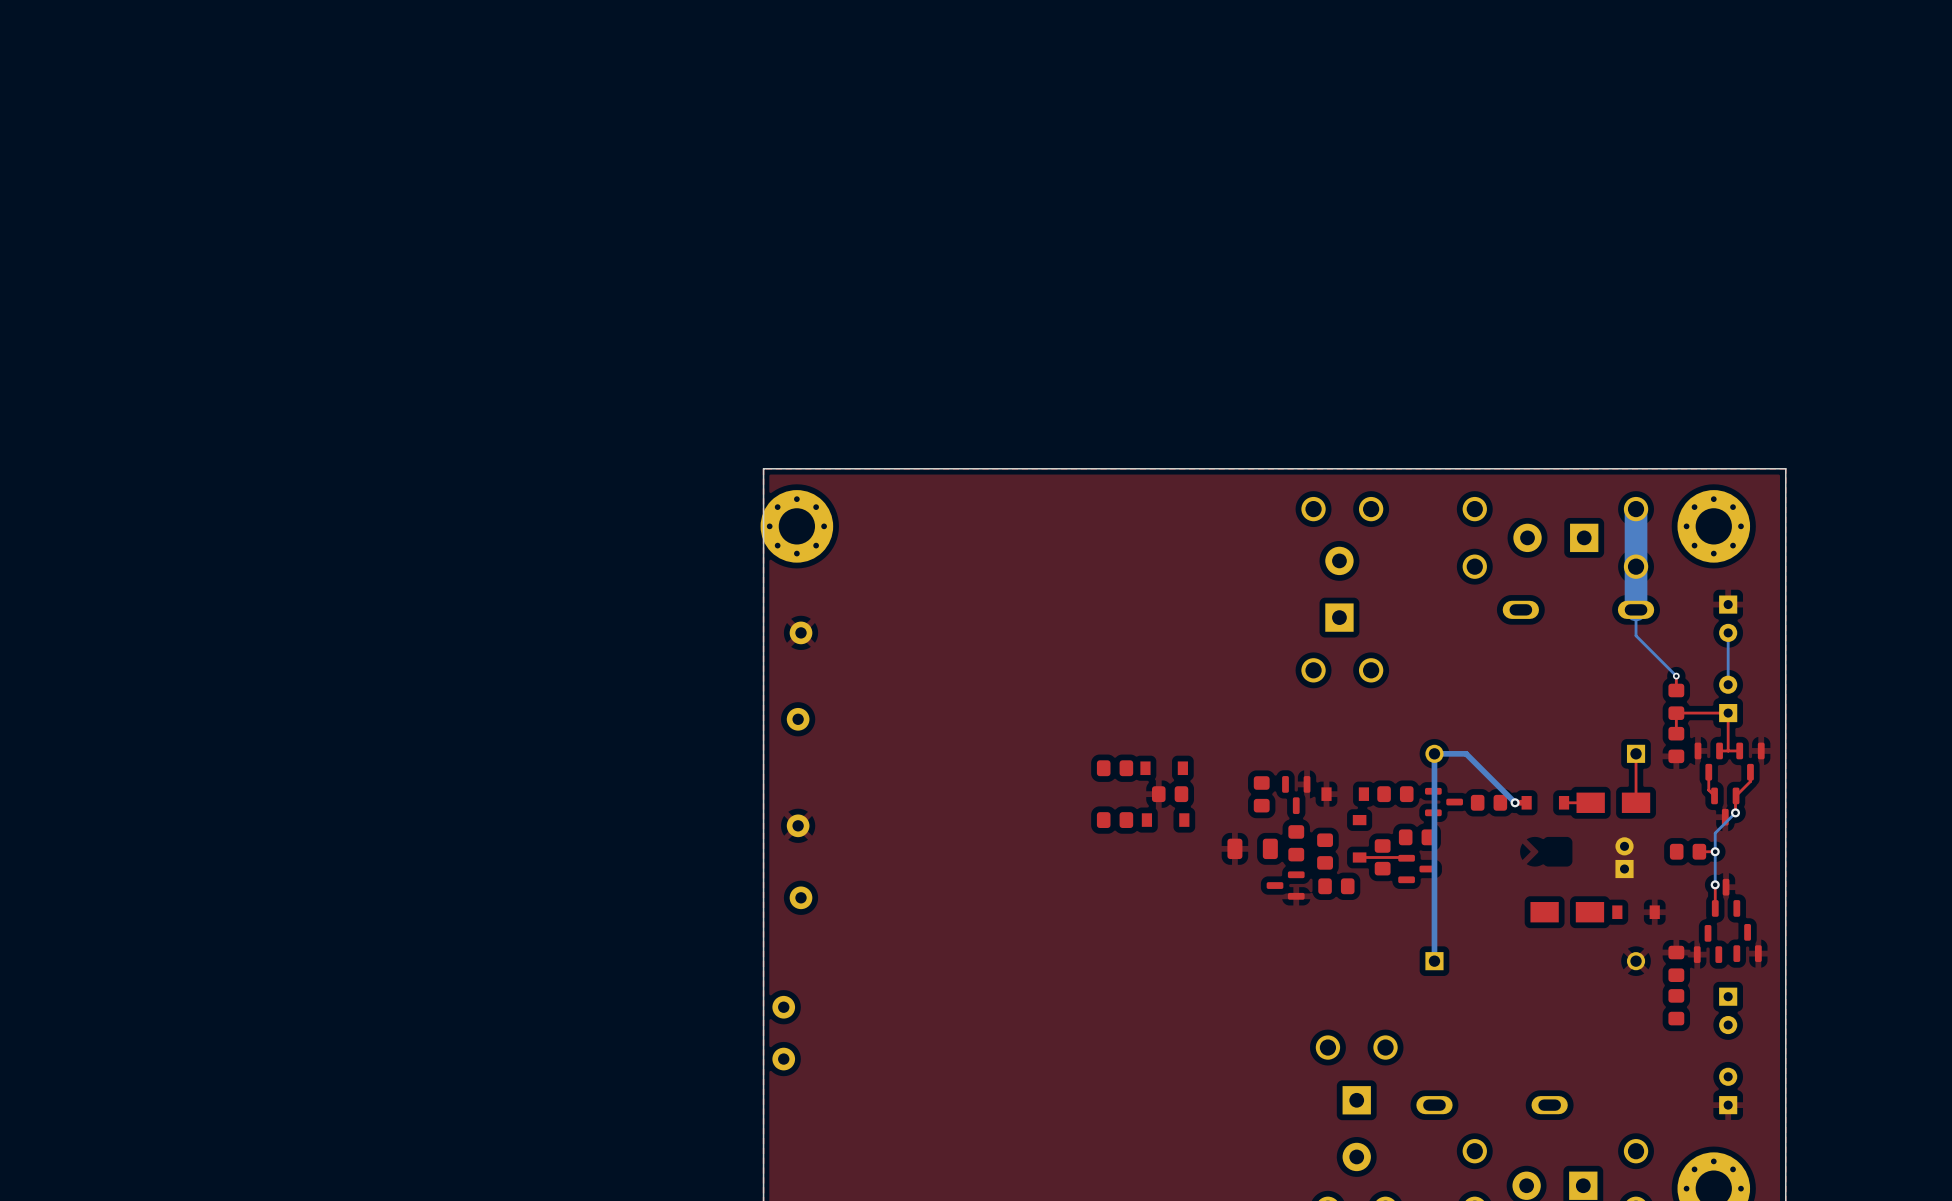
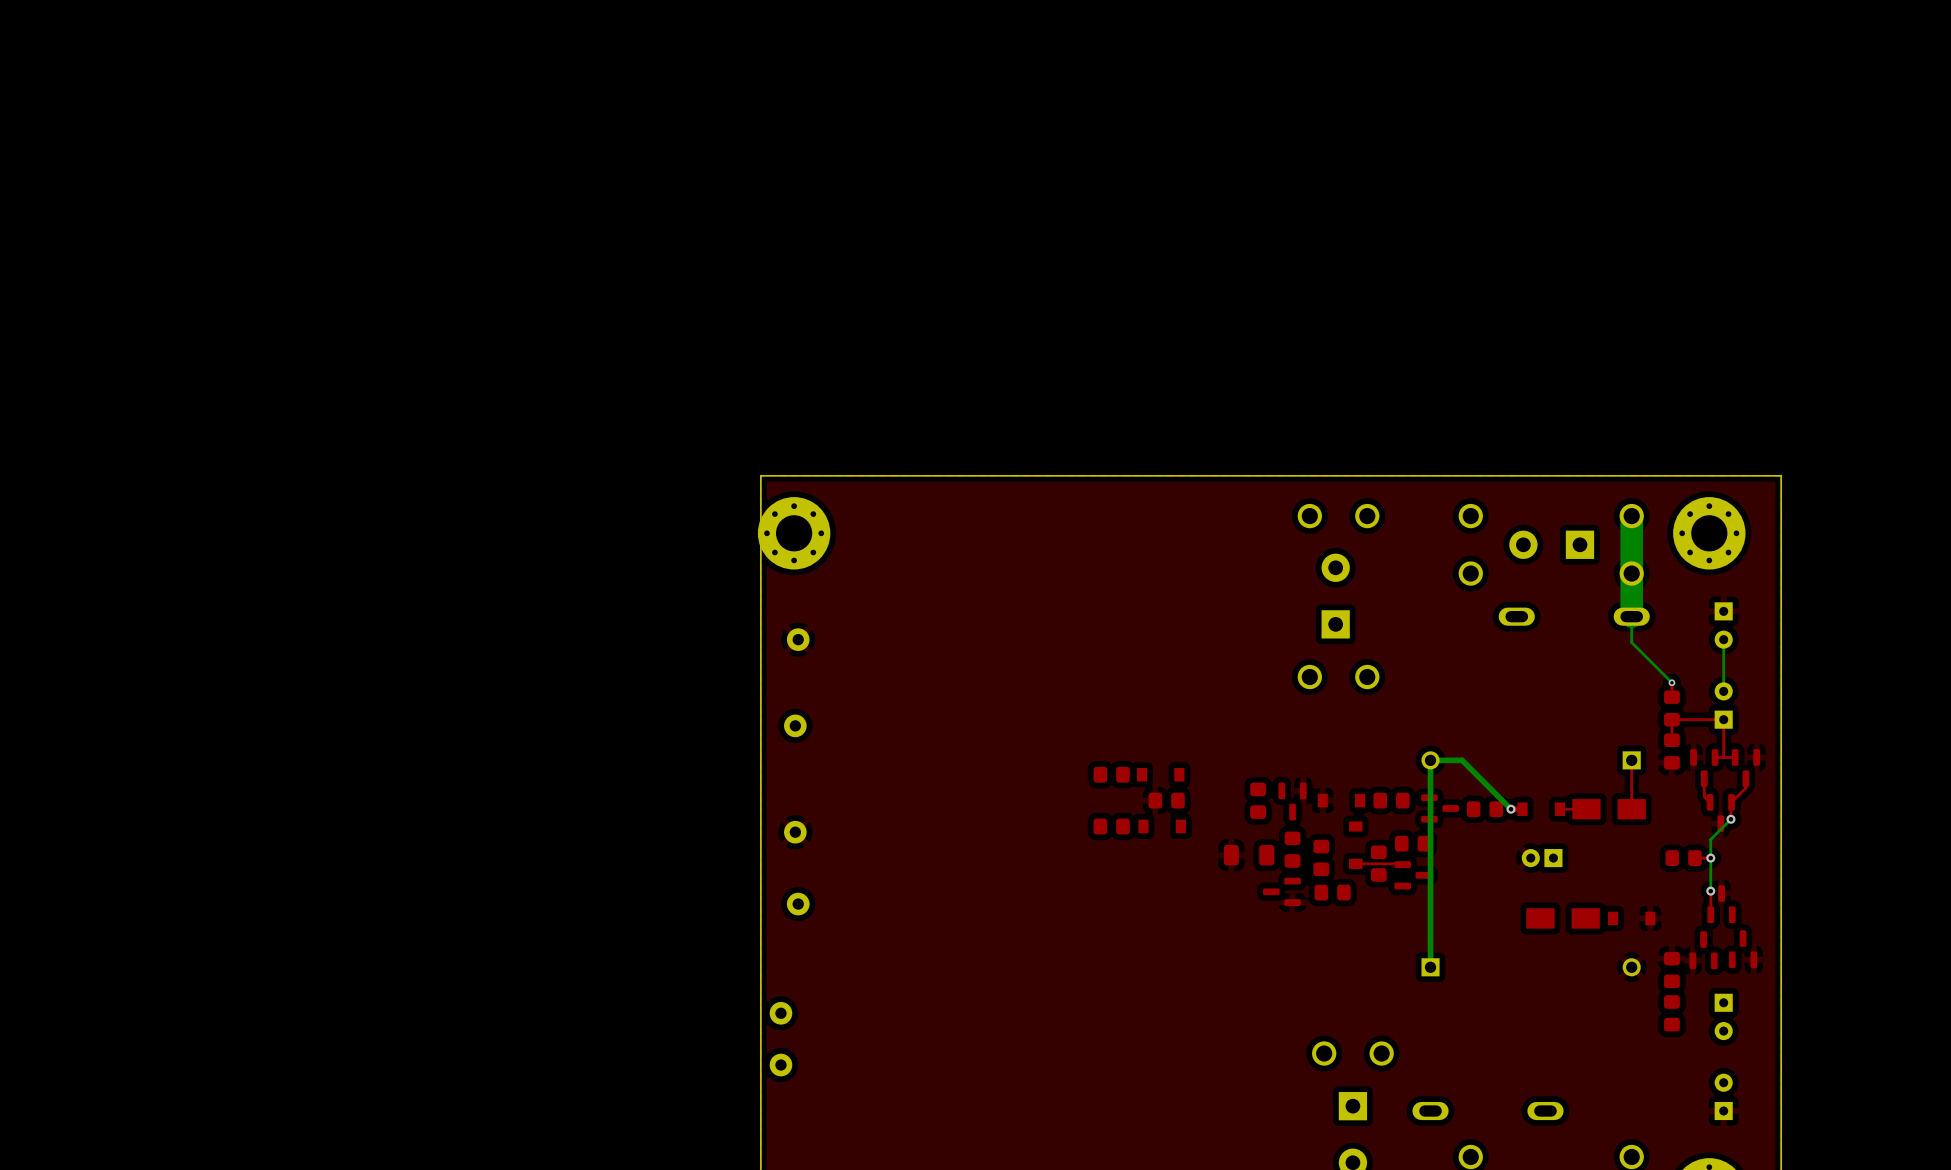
part rotation: 0° (1624, 857) -> 90° counterclockwise (1542, 858)
part position: (1624, 857) -> (1542, 858)

